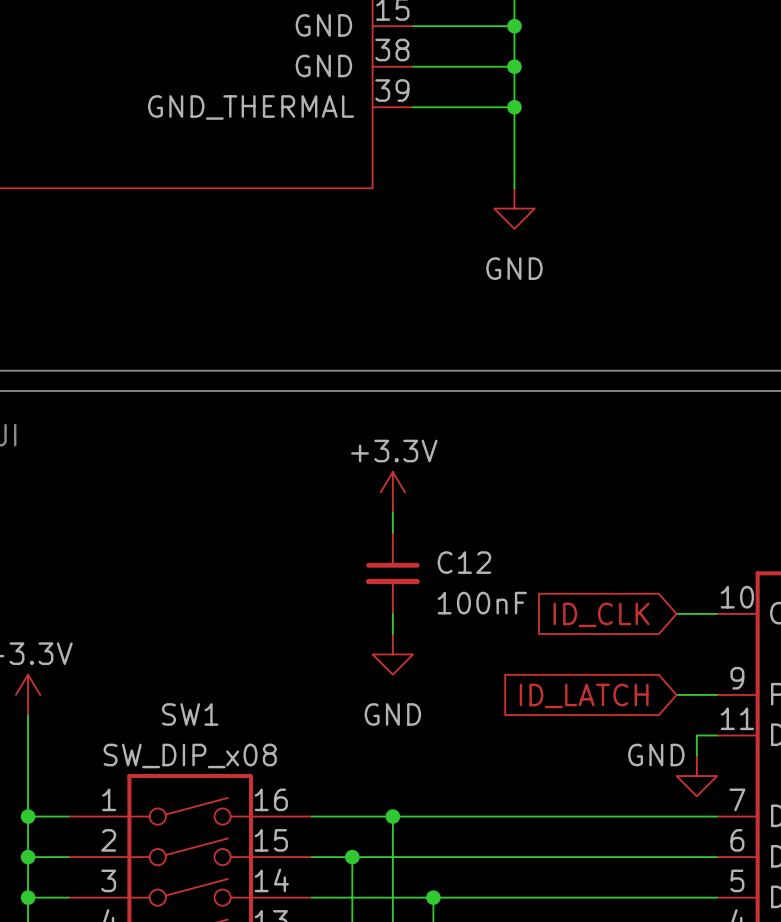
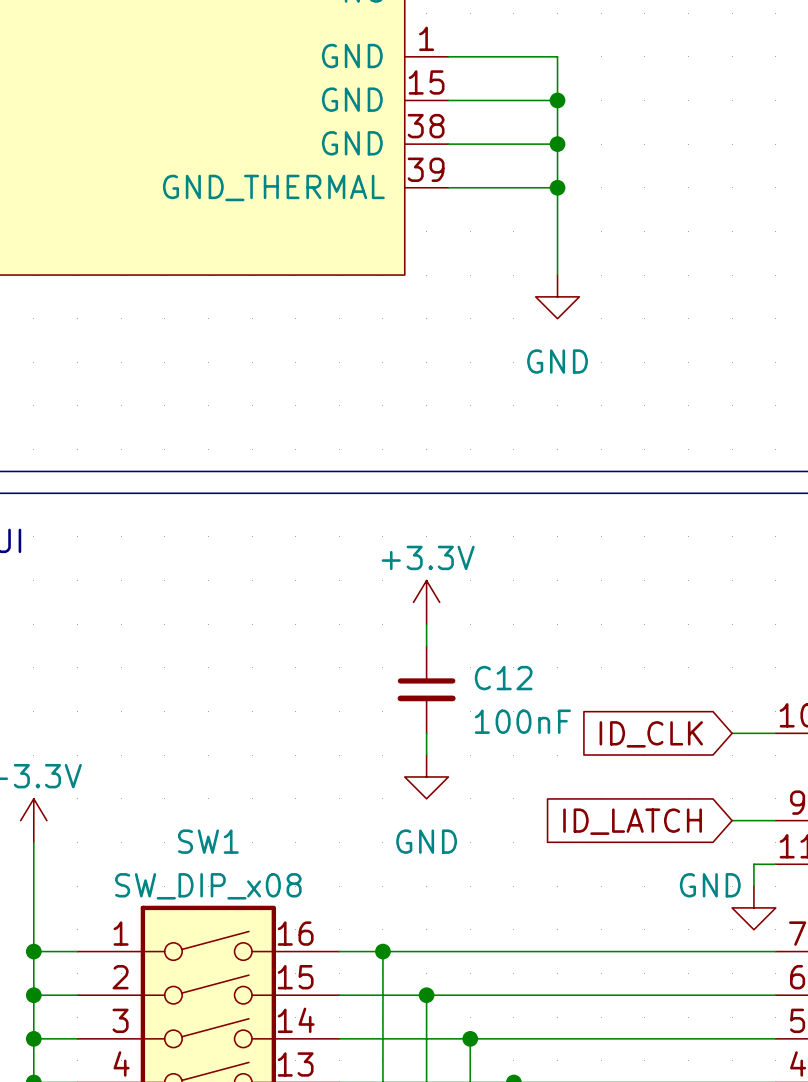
junction: none -> (382, 951)
wire: (392, 816) (392, 857) -> (382, 951) (382, 995)
junction: (392, 816) -> none
junction: (352, 857) -> none
junction: none -> (426, 995)

